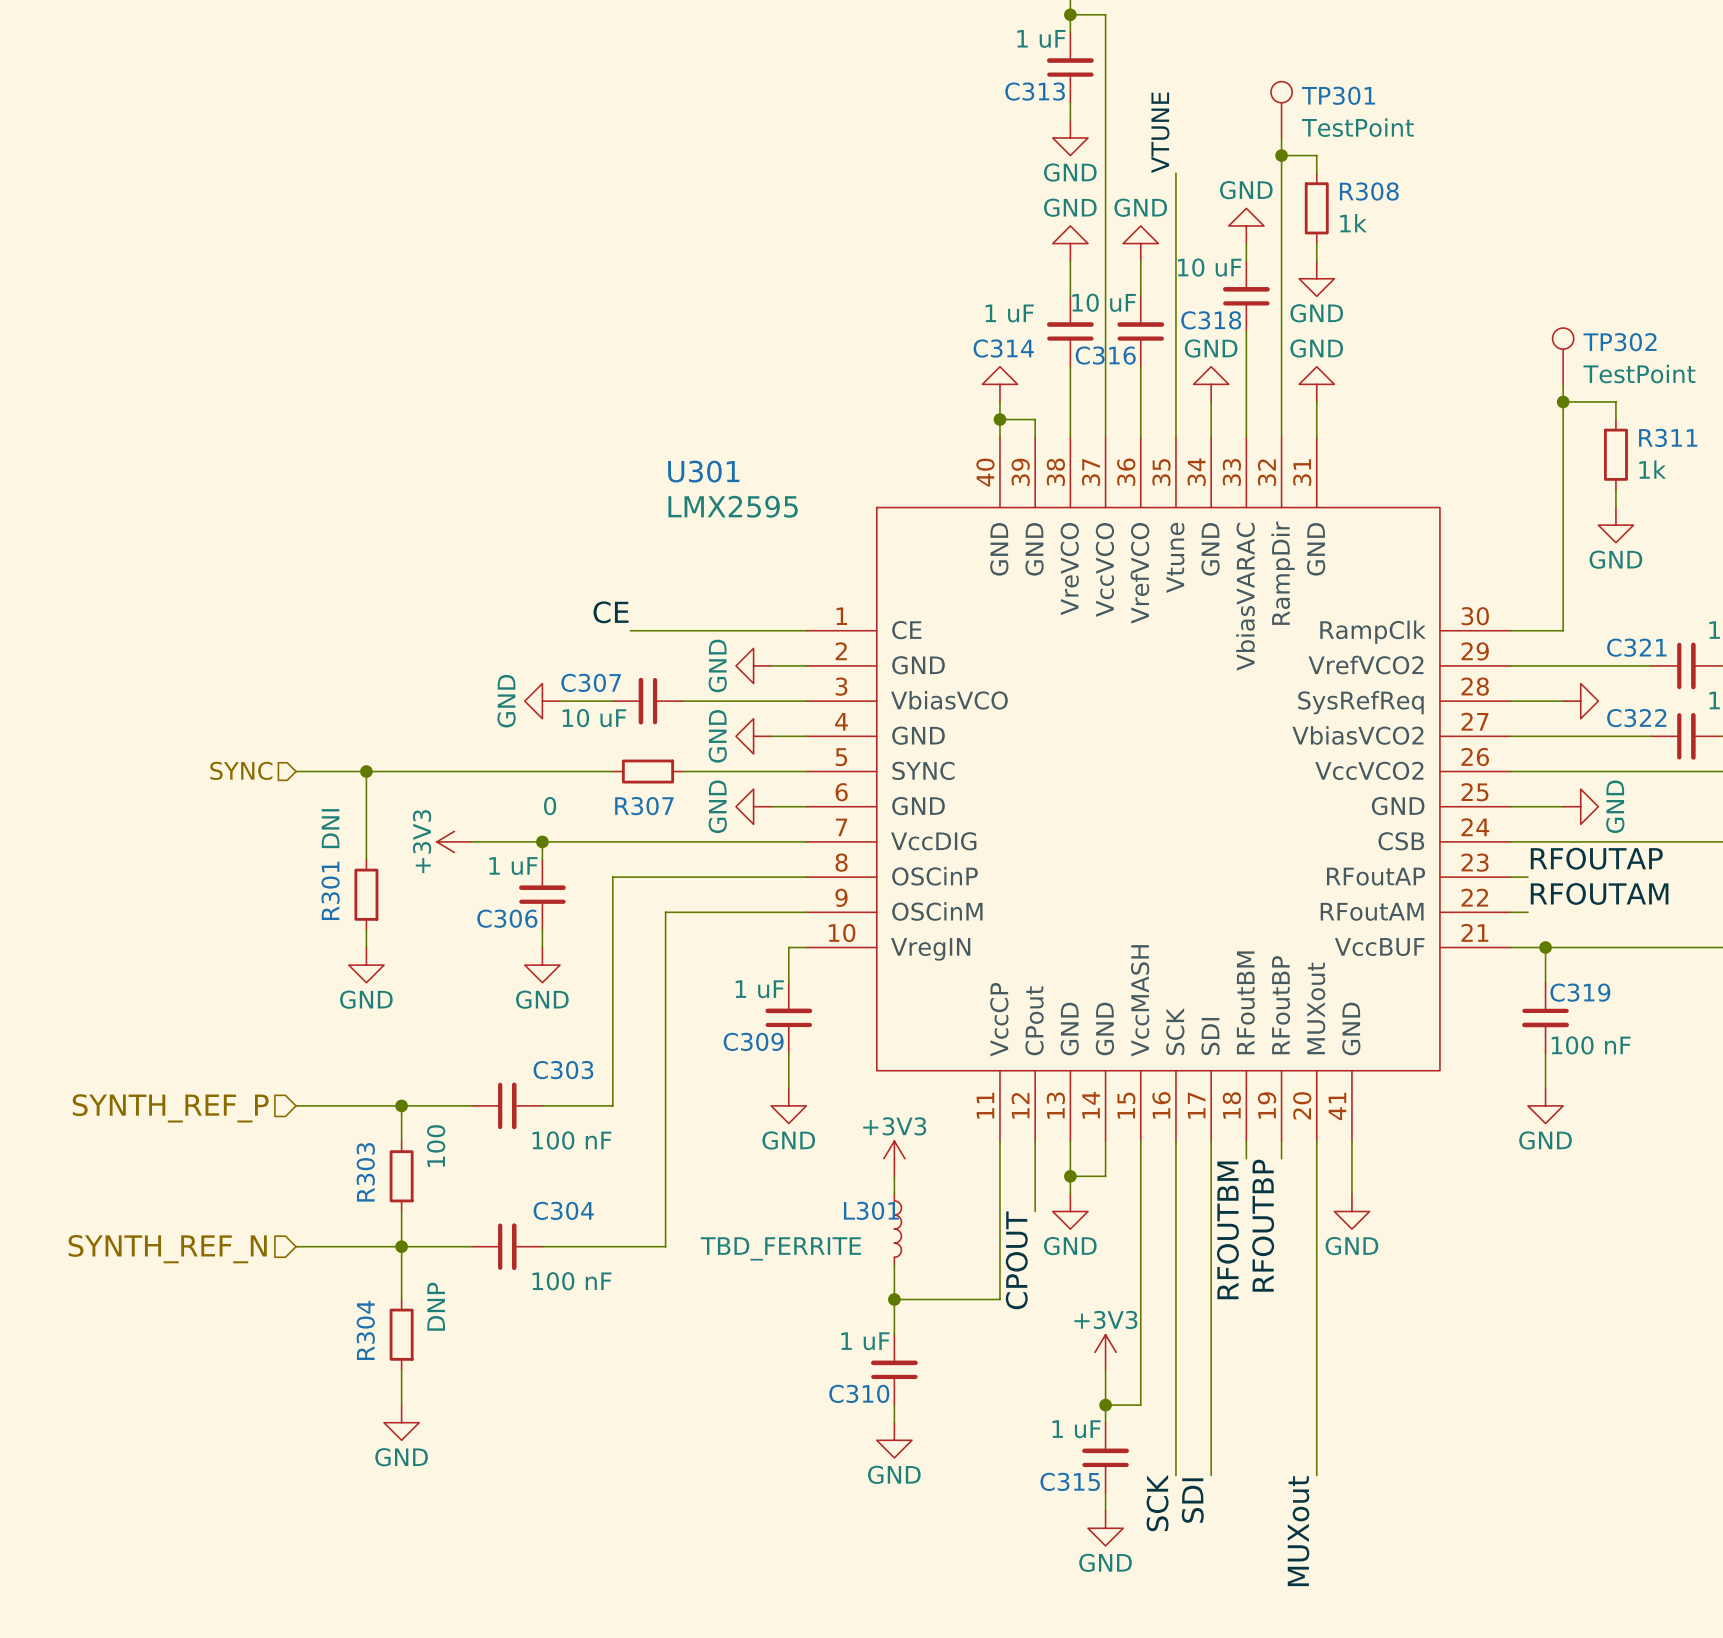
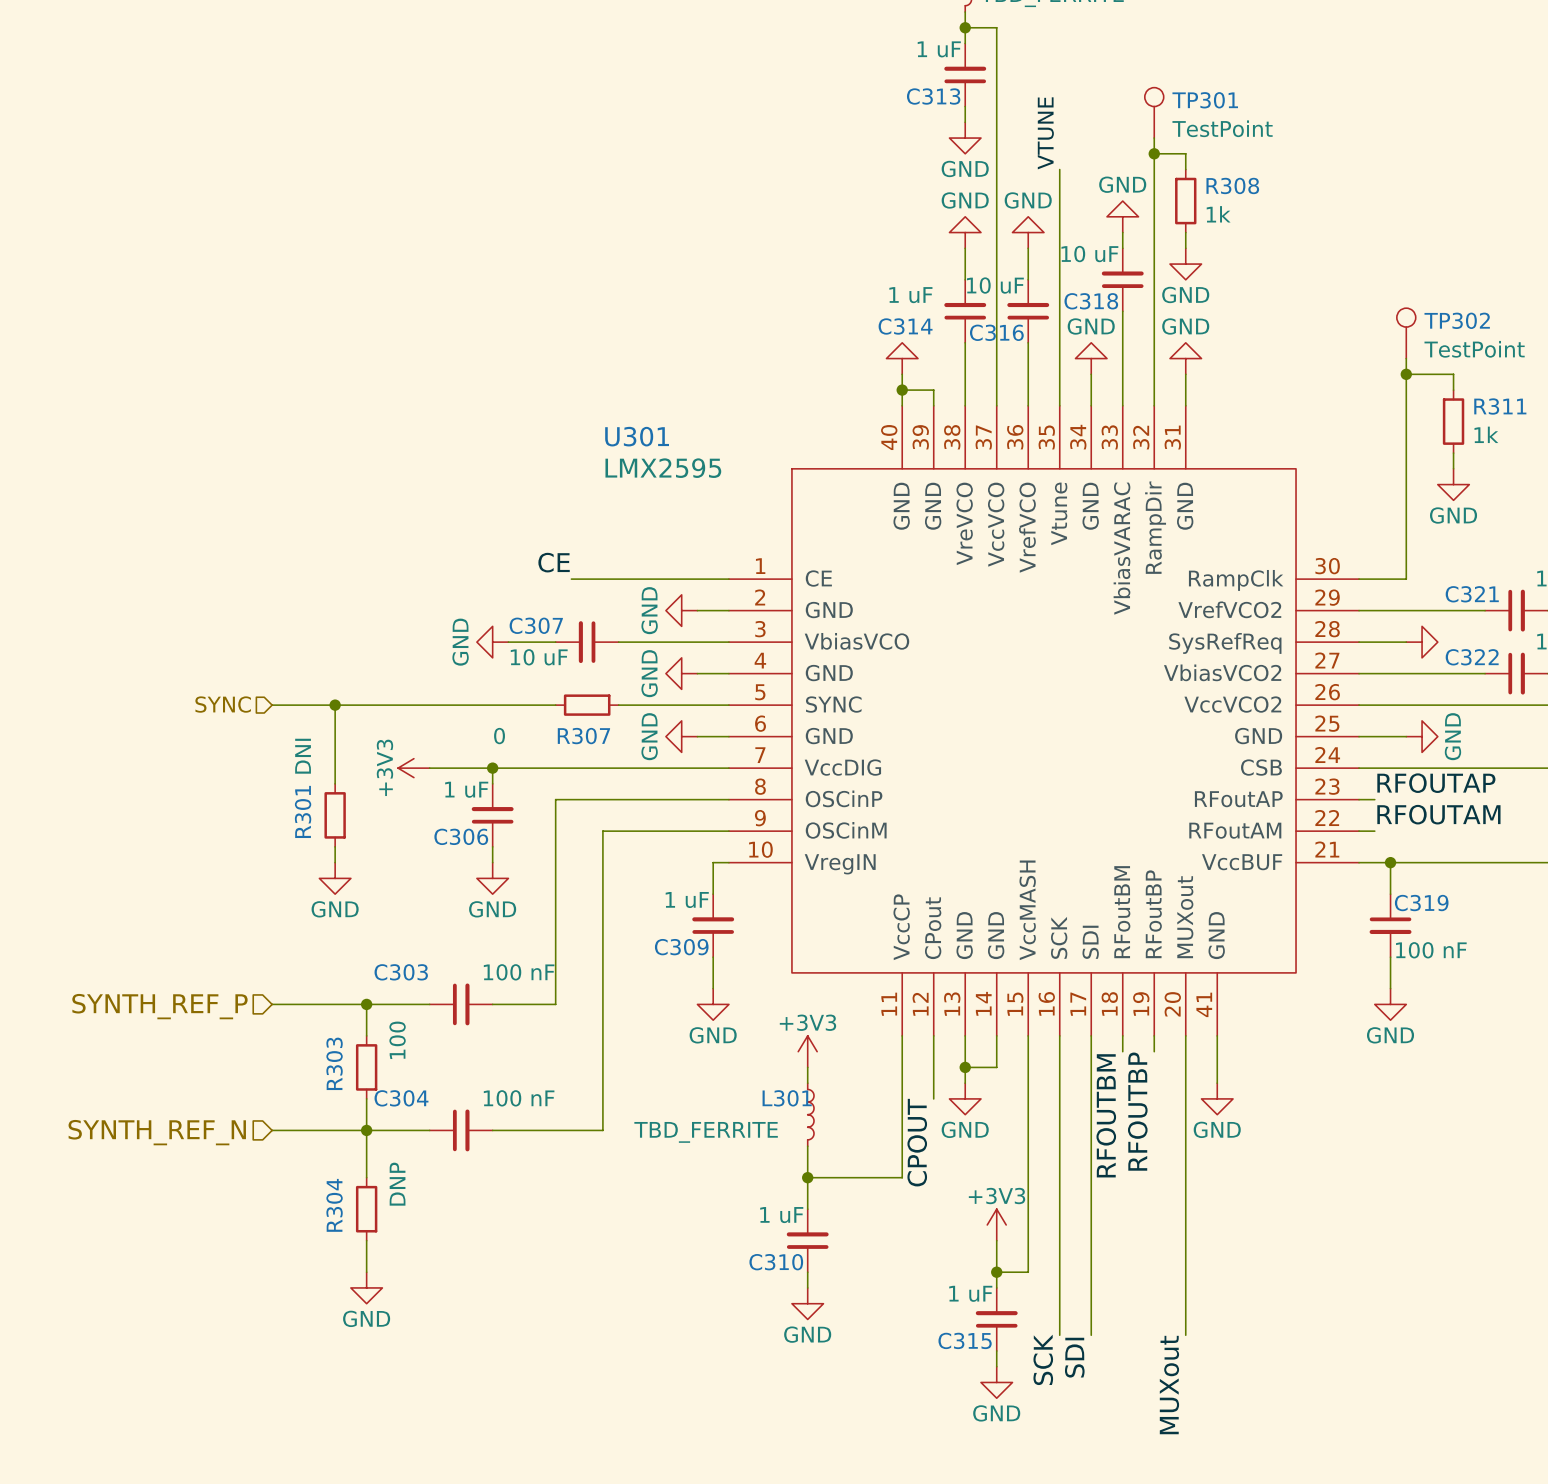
C303 name position: C303 (563, 1070) -> C303 (401, 972)
C303 value position: 100 nF (571, 1140) -> 100 nF (519, 972)
C304 name position: C304 (563, 1210) -> C304 (401, 1098)
C304 value position: 100 nF (571, 1281) -> 100 nF (519, 1098)

